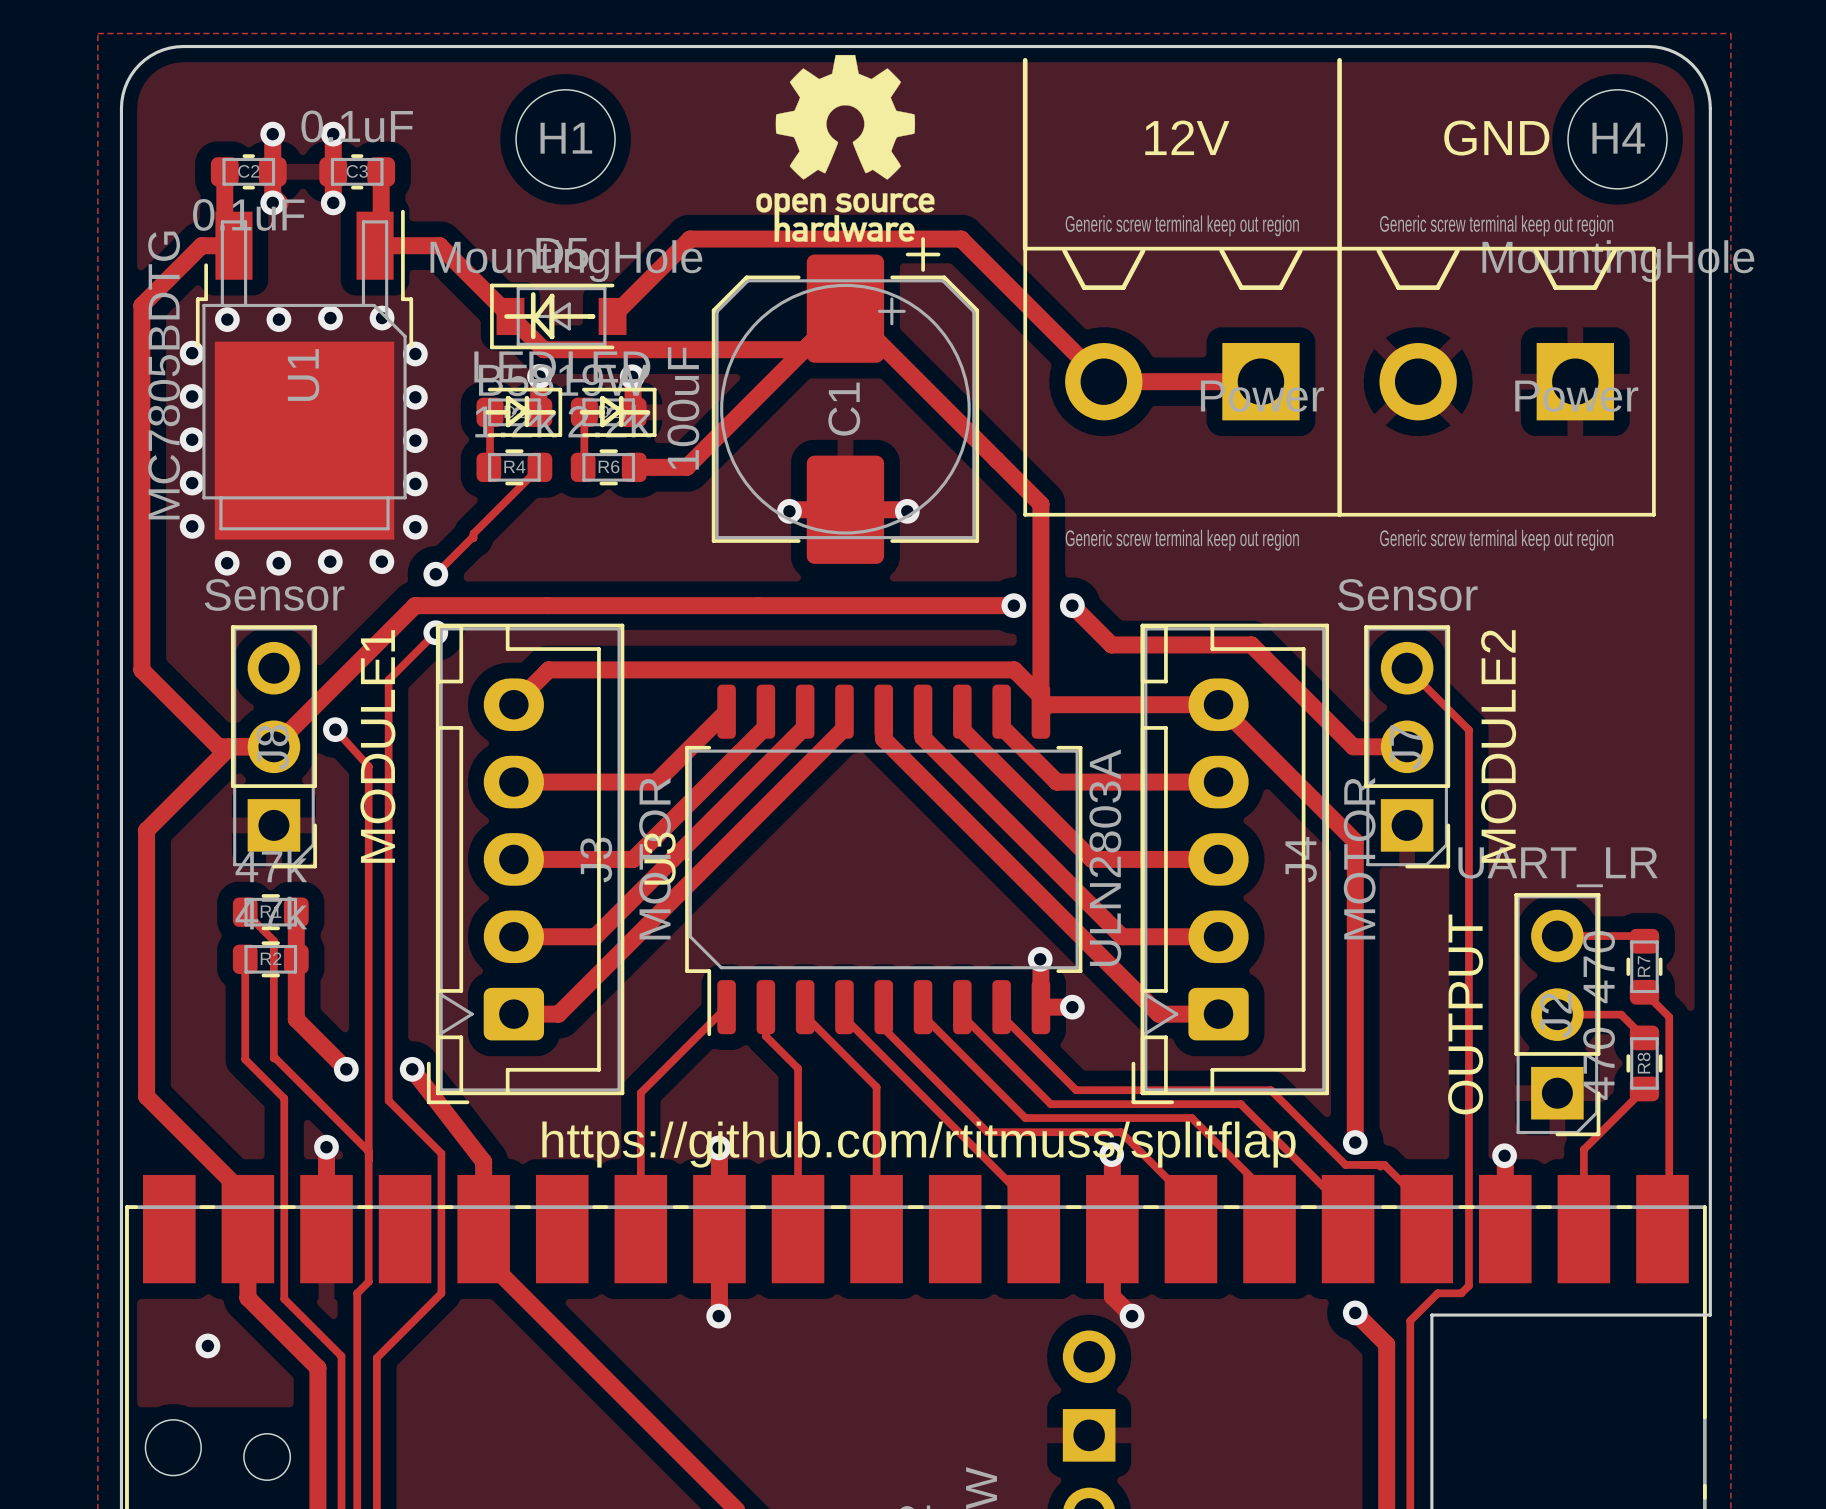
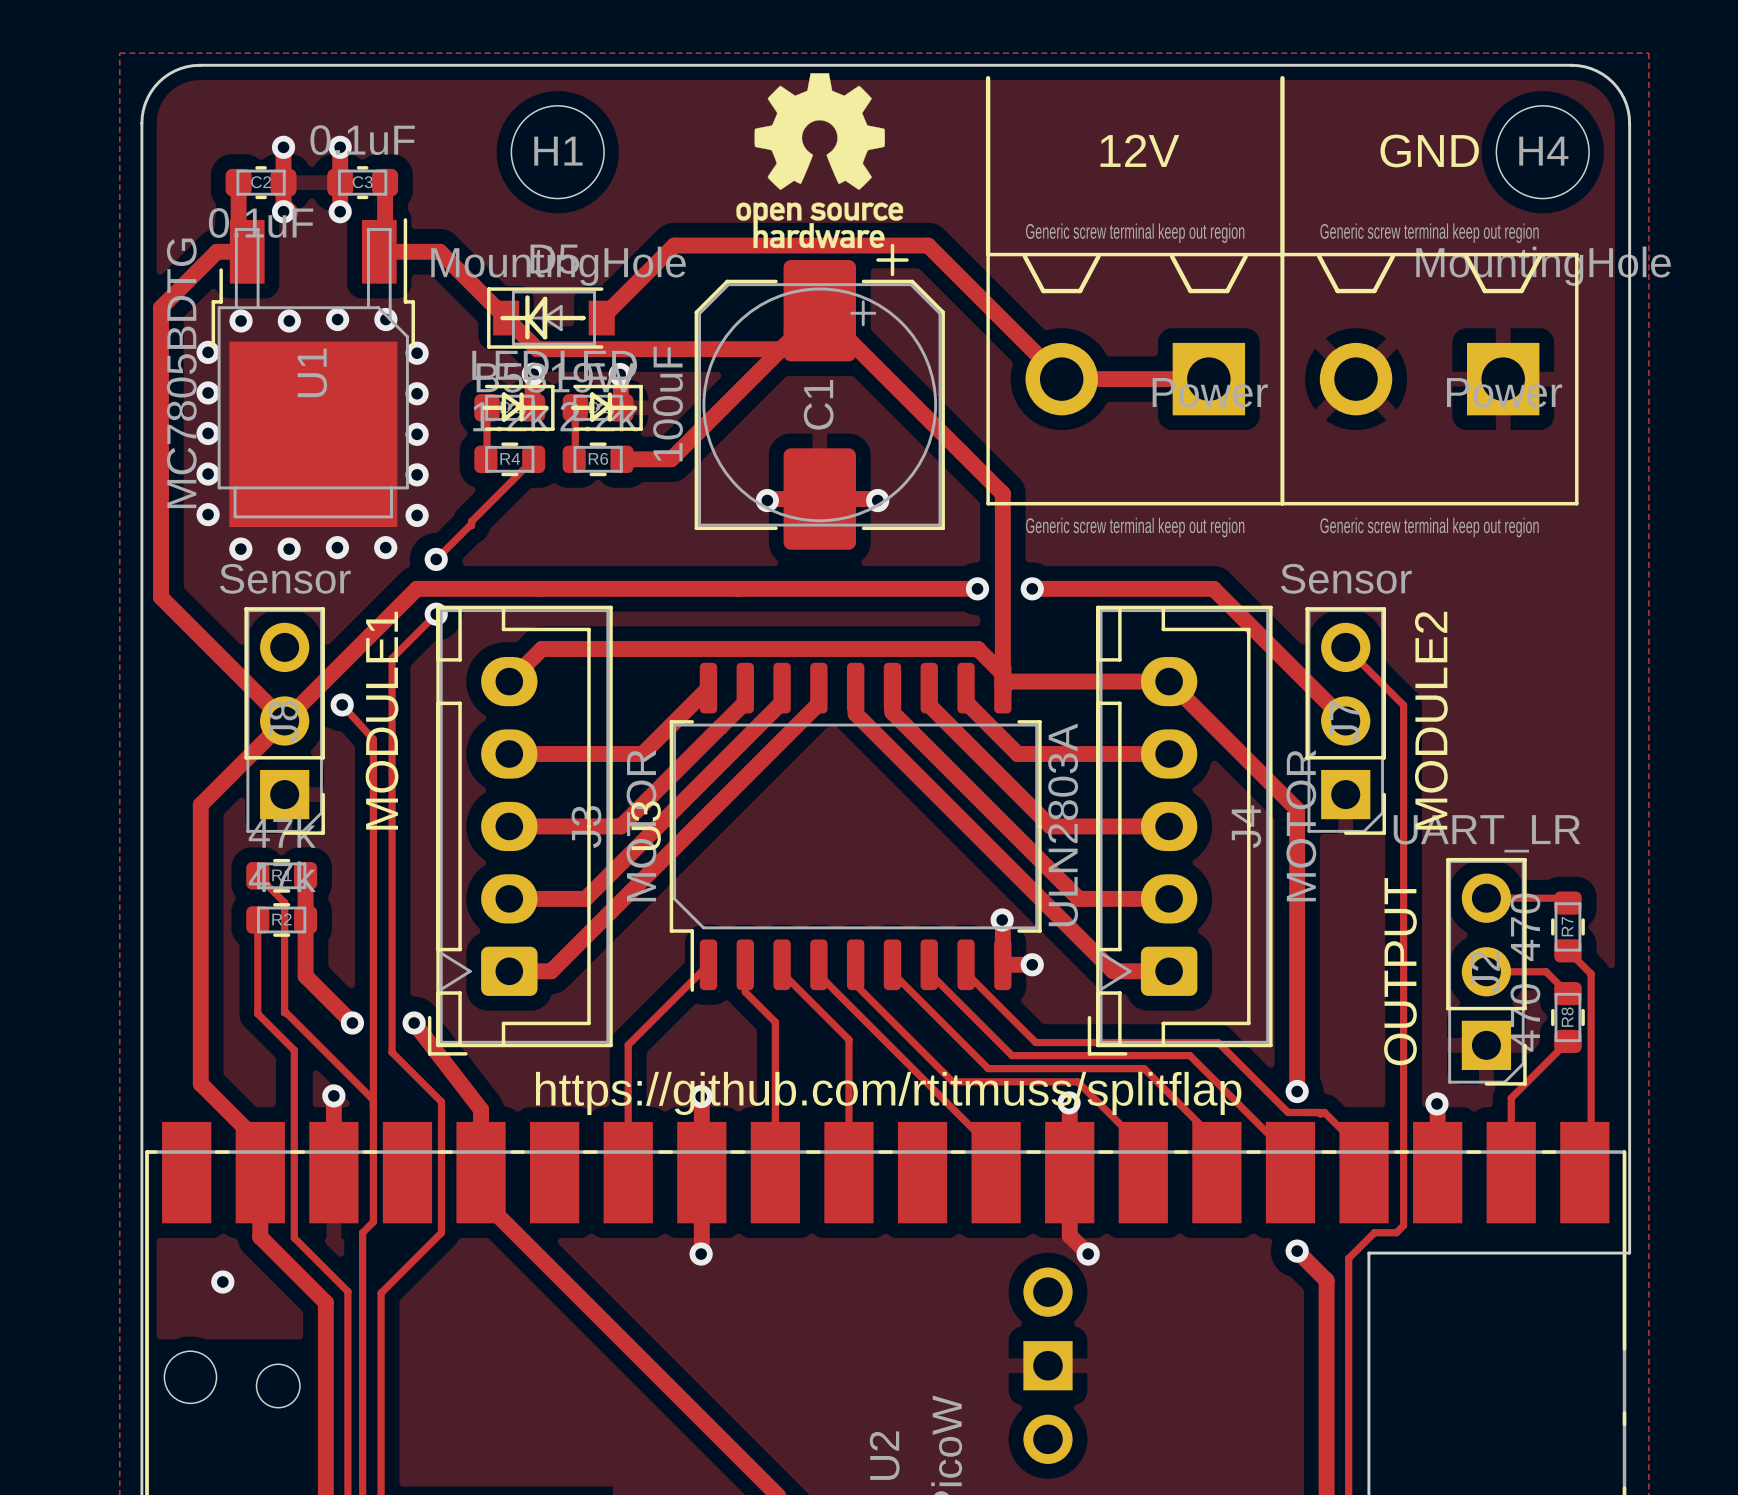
track: (1072, 605) (1111, 644) (1251, 644) (1353, 746) (1407, 746) -> (1032, 588) (1213, 588) (1345, 720)
track: (141, 614) (141, 670) (218, 746) (273, 746) -> none
track: (230, 746) (146, 830) (146, 1096) (184, 1134) -> (161, 597) (284, 720) (200, 804) (200, 1083)

